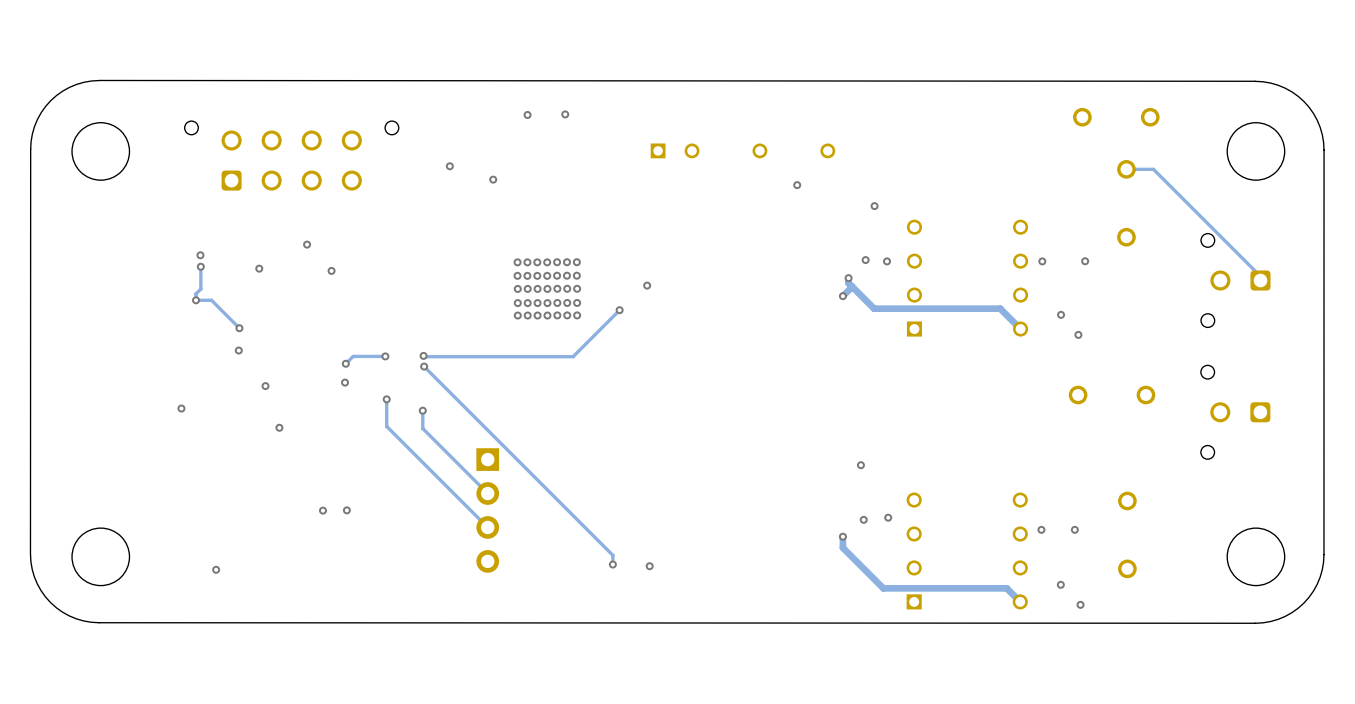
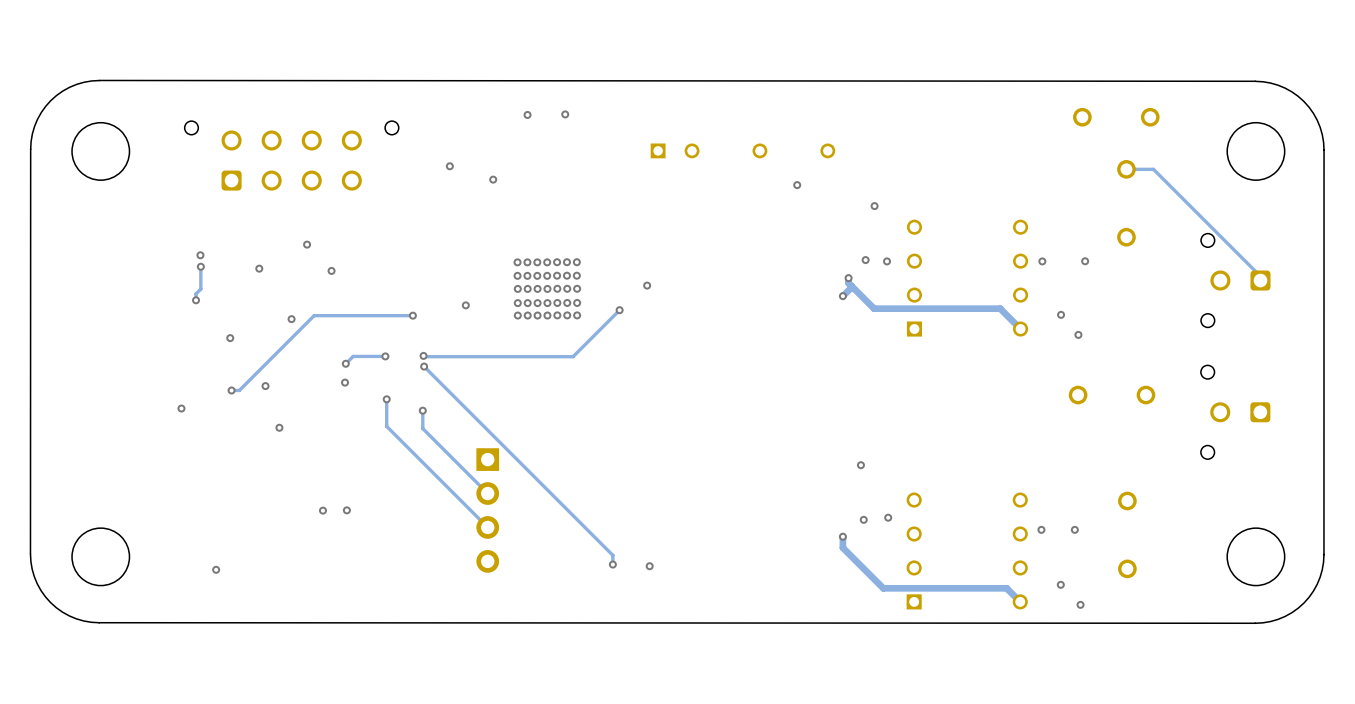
track: (196, 300) (211, 300) (239, 328) -> none
via: none -> (465, 305)
track: none -> (412, 315) (314, 315) (239, 390) (231, 390)
via: none -> (412, 315)
via: none -> (291, 319)
via: (239, 328) -> none
via: none -> (230, 338)
via: (238, 350) -> none
via: none -> (231, 390)

